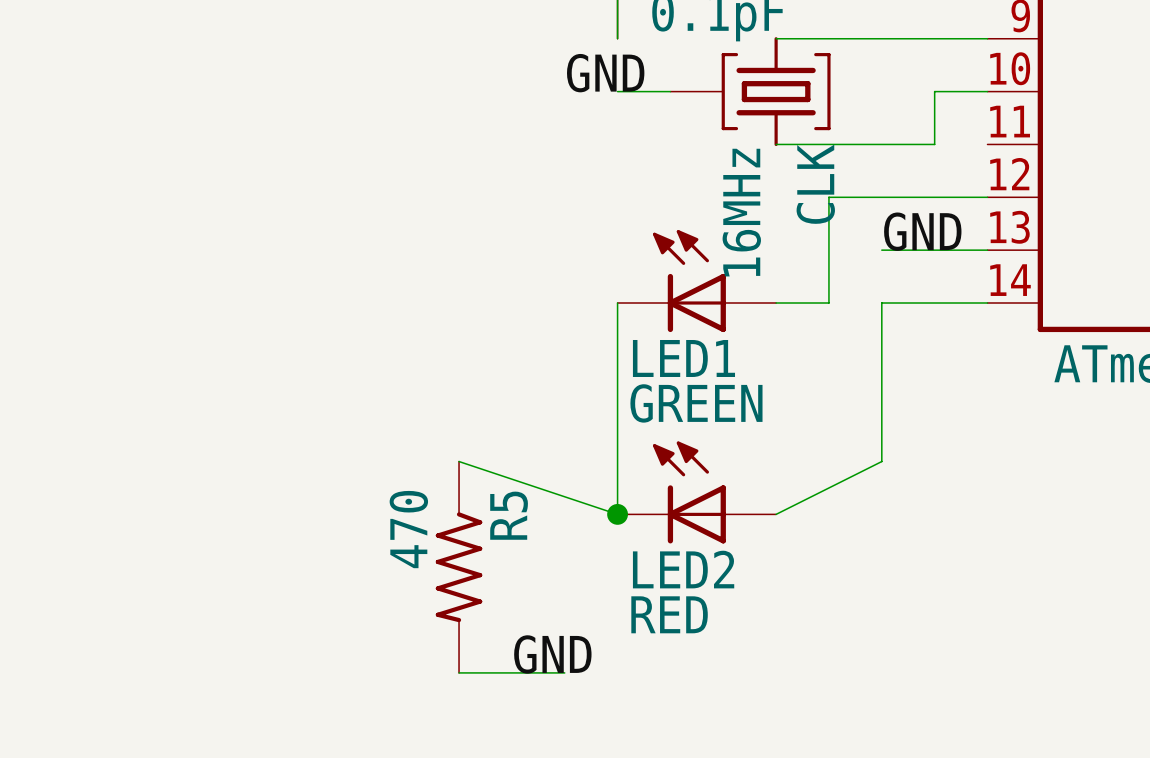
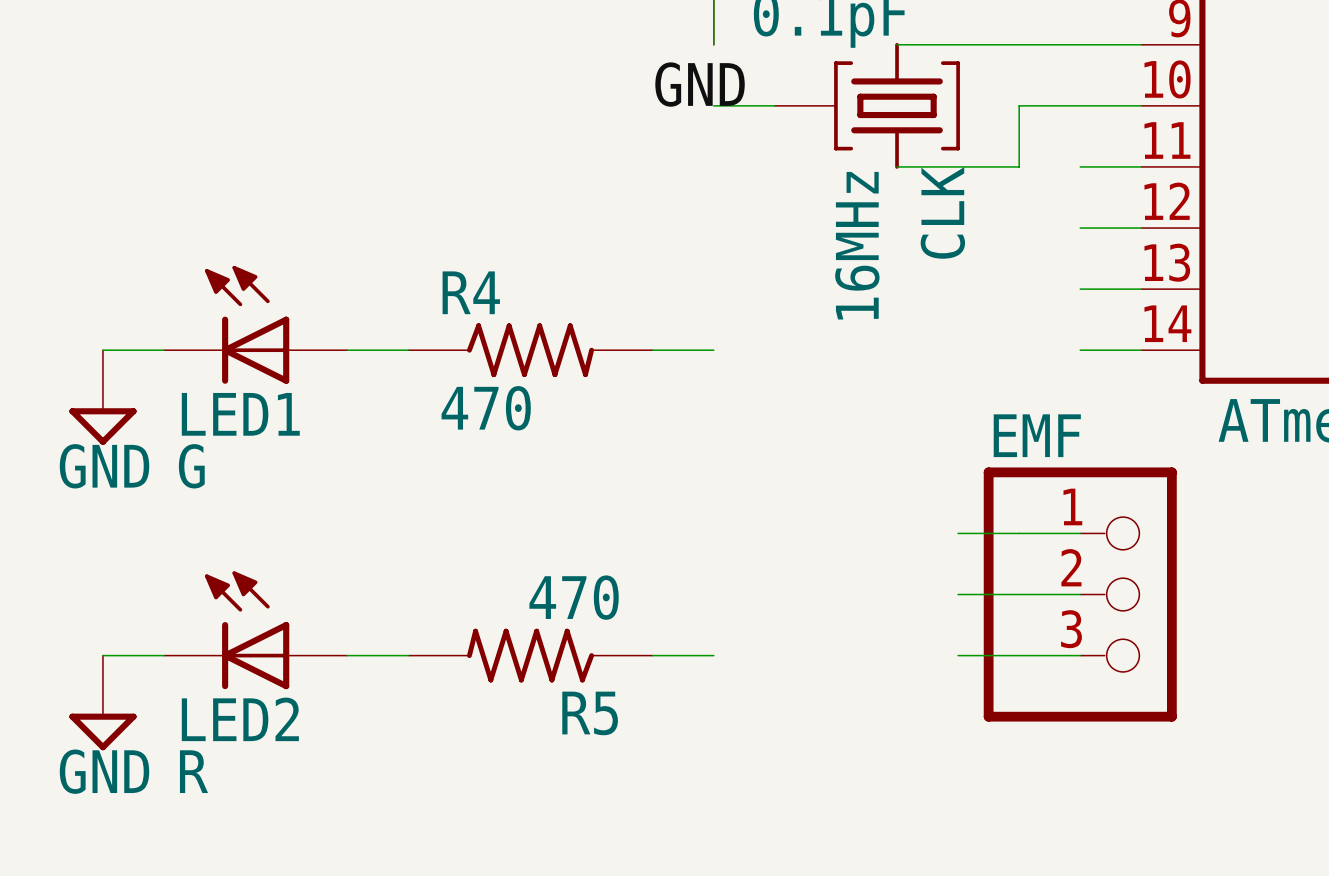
wire: (934, 91) (934, 144) (881, 144) -> (1080, 105) (1019, 105) (1019, 166)
wire: (934, 197) (828, 197) (828, 303) (776, 303) -> none
label: GND (922, 231) -> none
wire: (881, 250) (934, 250) -> (1080, 166) (1141, 166)
LED1 position: (696, 281) -> (255, 324)
wire: none -> (102, 350) (164, 350)
wire: none -> (347, 350) (408, 350)
R4: none -> 470 (530, 350)
wire: (617, 303) (617, 514) (459, 461) -> (713, 350) (652, 350)
wire: (934, 303) (881, 303) (881, 461) (776, 514) -> none
power symbol: none -> GND (102, 397)
LED1 value: GREEN (696, 403) -> G (191, 466)
wire: none -> (958, 533) (1080, 533)
LED2 position: (696, 492) -> (255, 630)
junction: (617, 514) -> none
wire: none -> (958, 594) (1080, 594)
EMF: none -> (1080, 594)
wire: none -> (102, 655) (164, 655)
wire: none -> (347, 655) (408, 655)
R5 rotation: 0° (459, 567) -> 90° clockwise (530, 655)
wire: none -> (652, 655) (713, 655)
power symbol: none -> GND (102, 702)
LED2 value: RED (669, 614) -> R (193, 771)
label: GND (552, 654) -> none
wire: (459, 672) (564, 672) -> (958, 655) (1080, 655)

